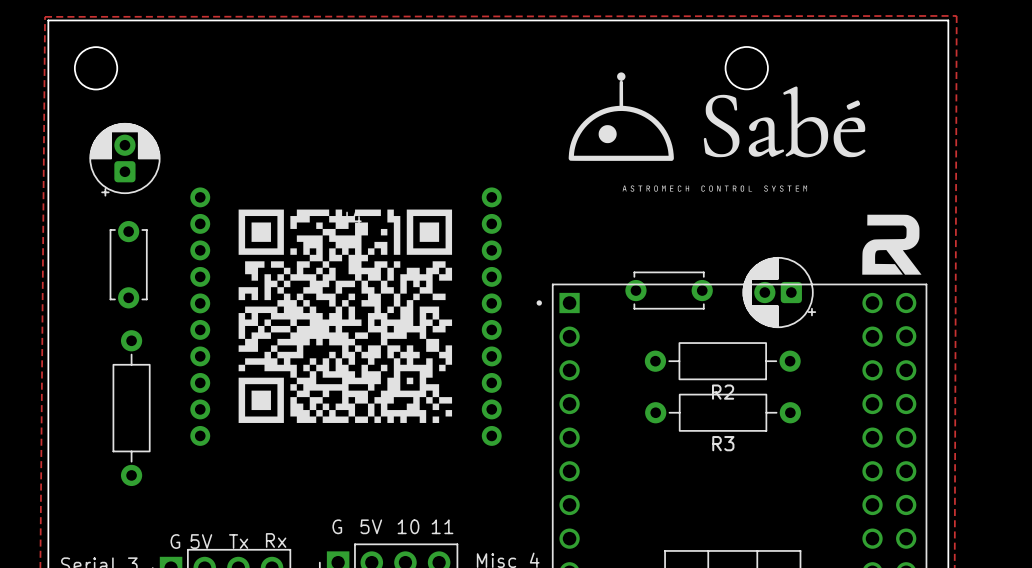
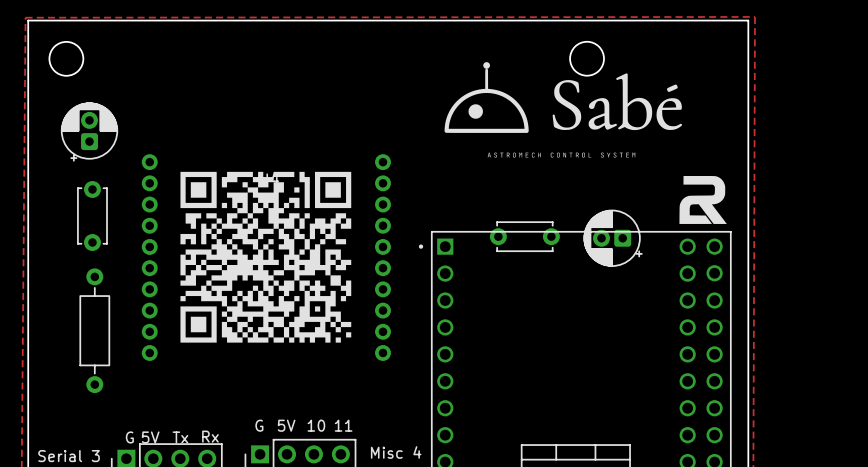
R2: (722, 361) -> none
R3: (723, 412) -> none

